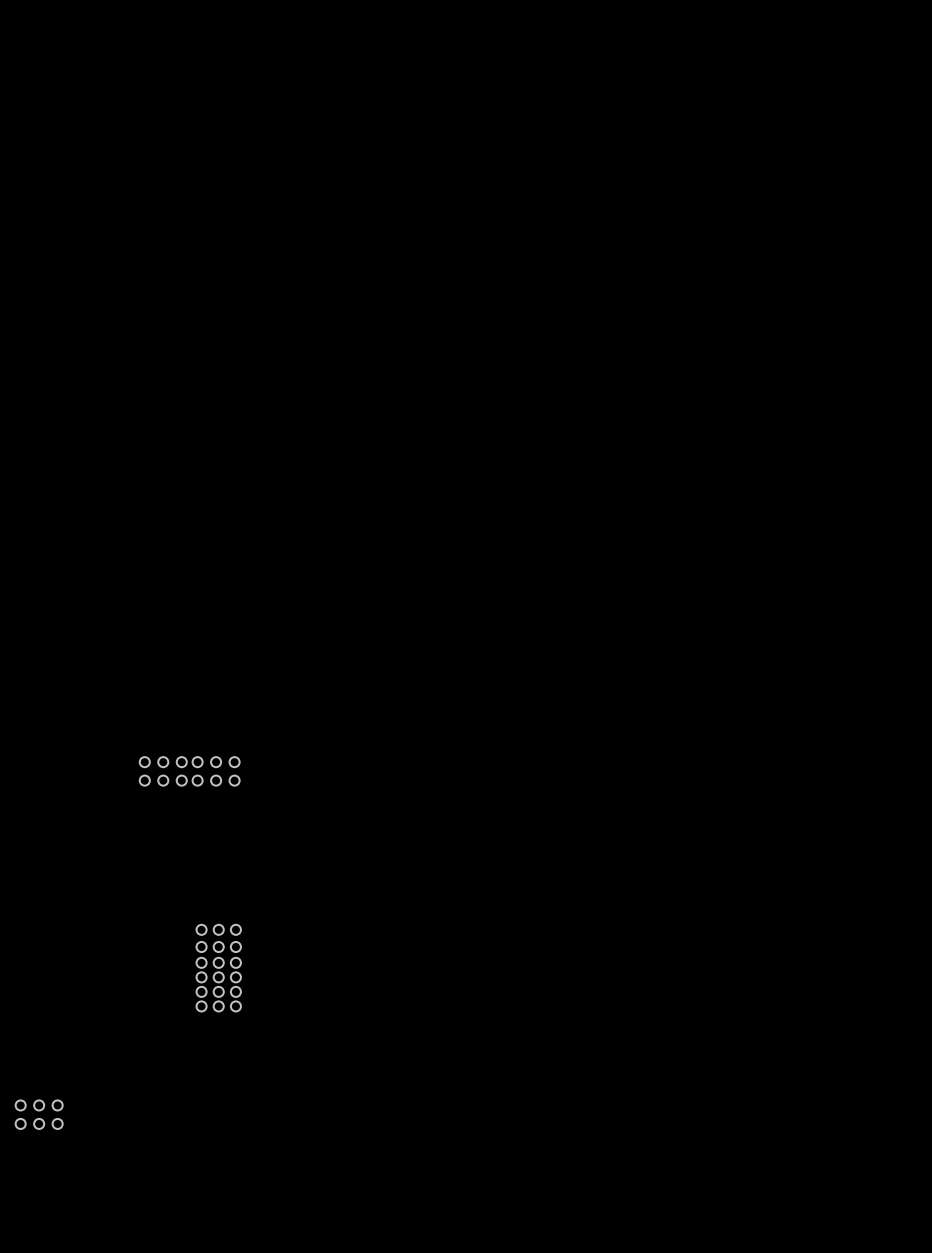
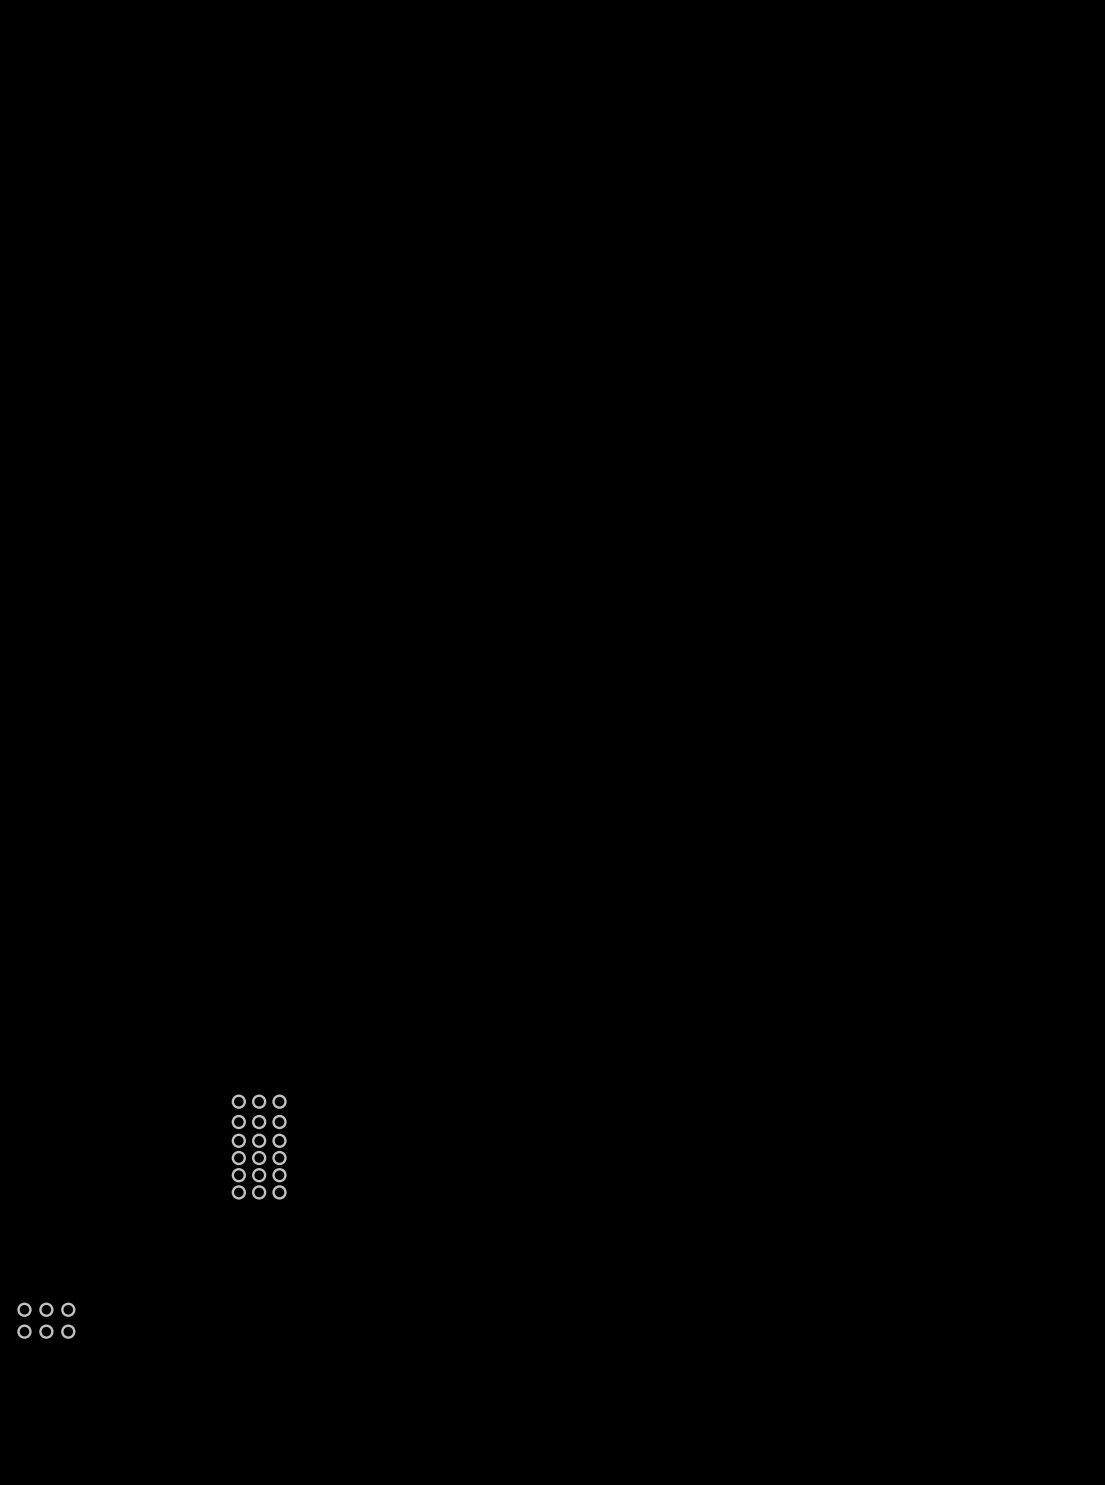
via: (144, 762) -> none
via: (163, 762) -> none
via: (181, 762) -> none
via: (197, 762) -> none
via: (216, 762) -> none
via: (234, 762) -> none
via: (144, 780) -> none
via: (163, 780) -> none
via: (181, 780) -> none
via: (197, 780) -> none
via: (216, 780) -> none
via: (234, 780) -> none

